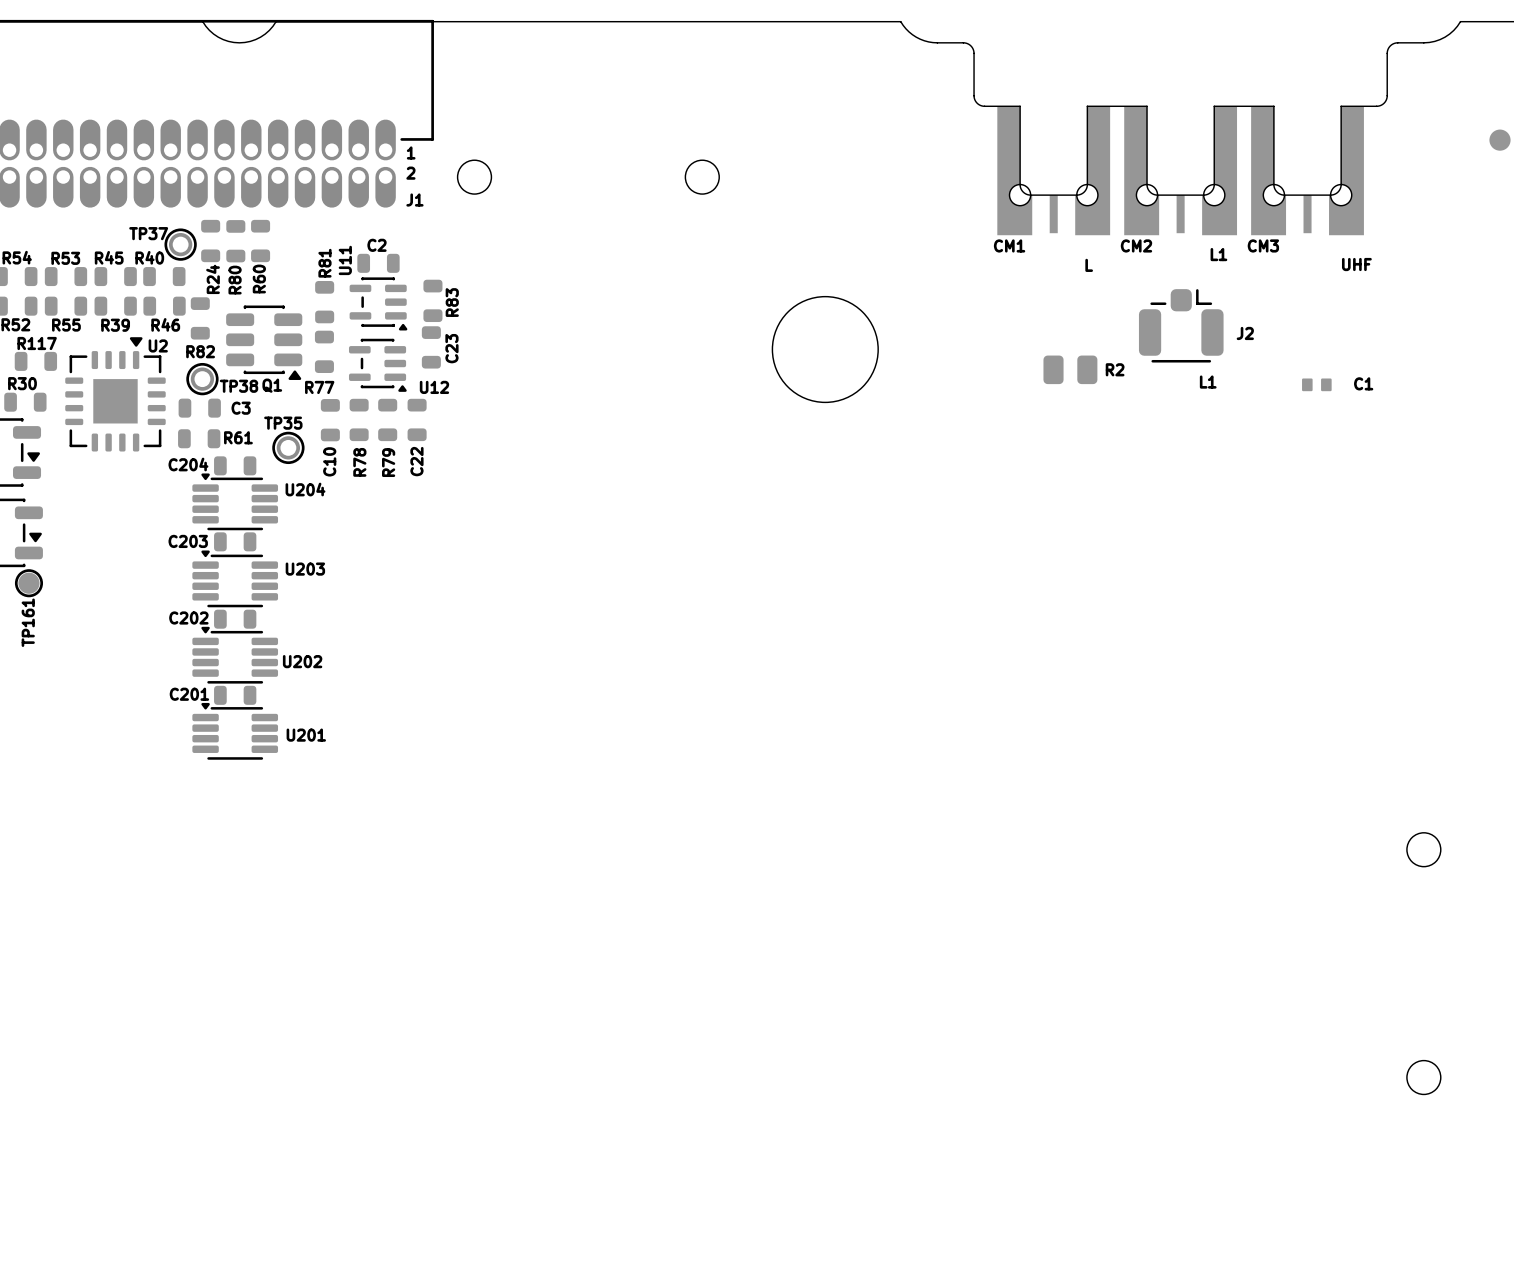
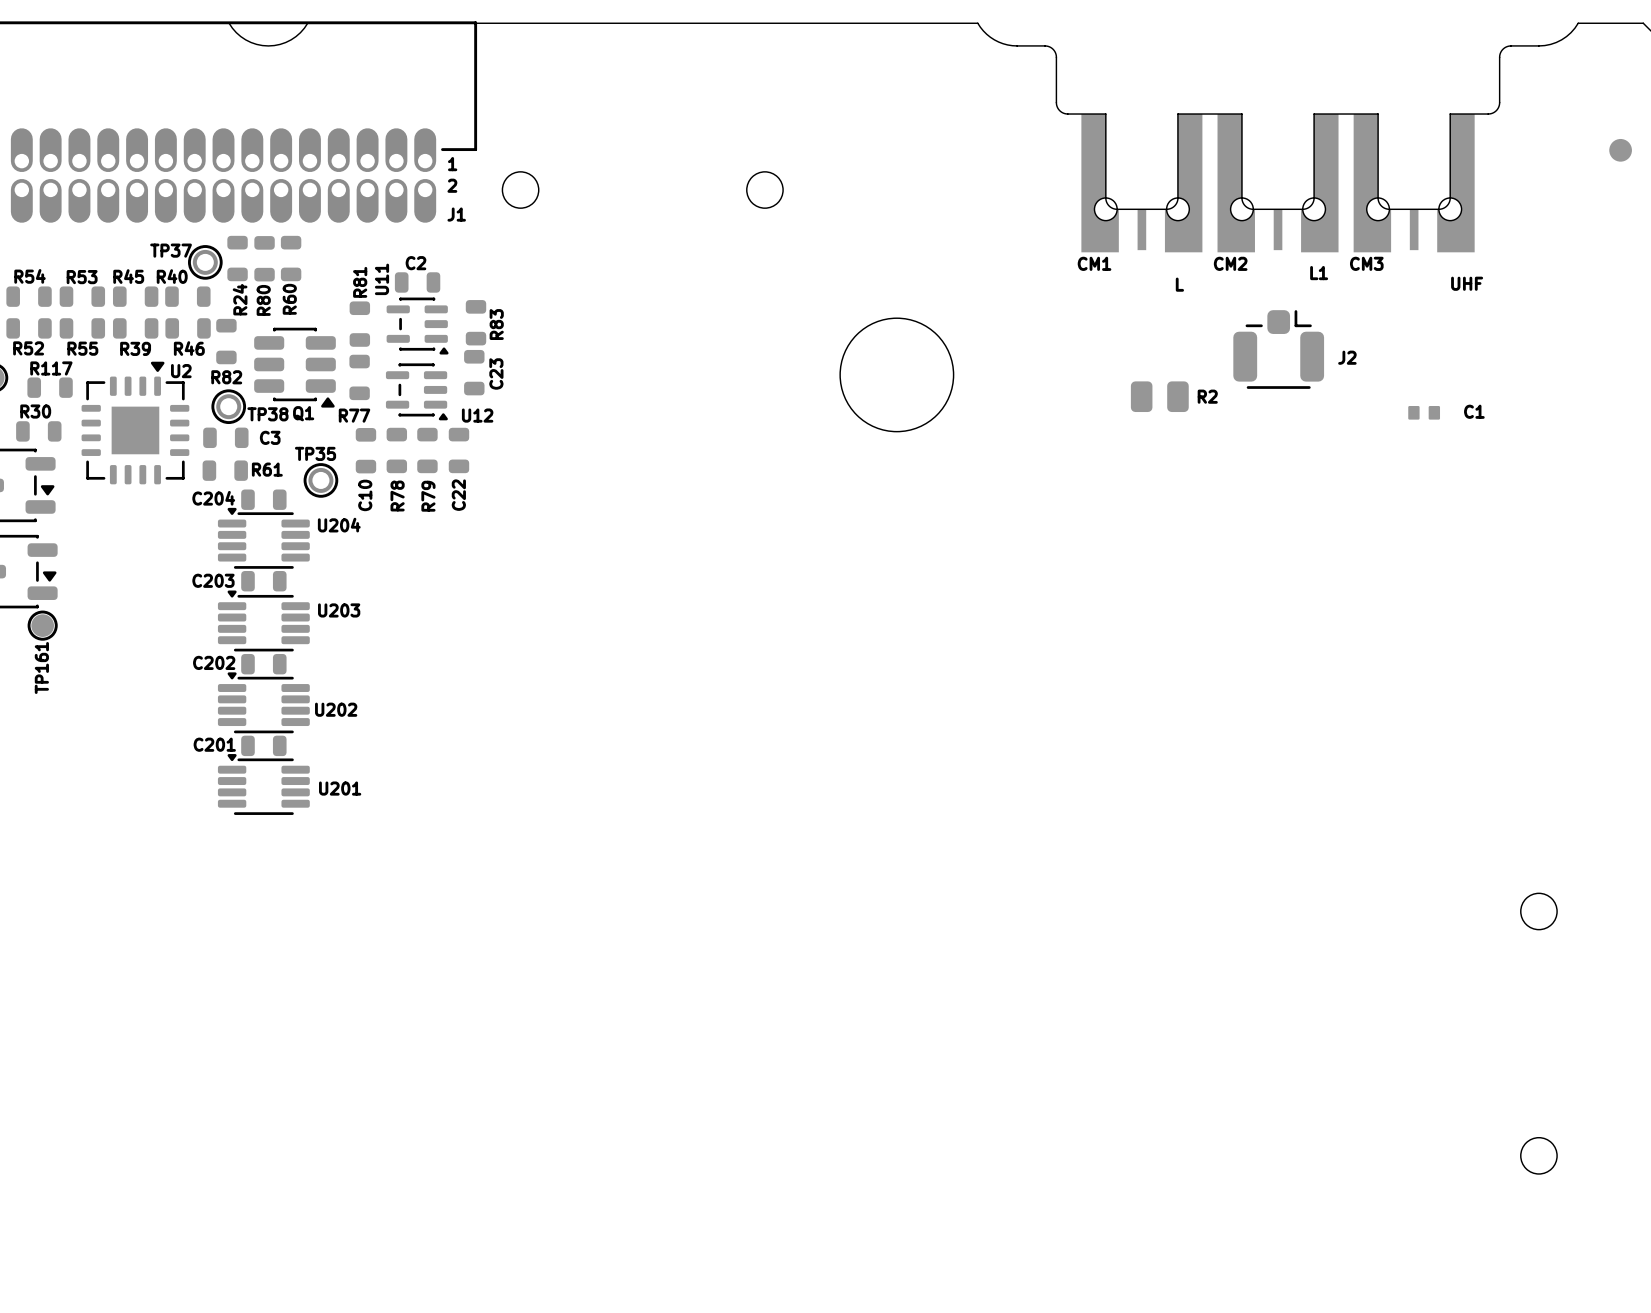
text: L1 (1208, 382) -> none

